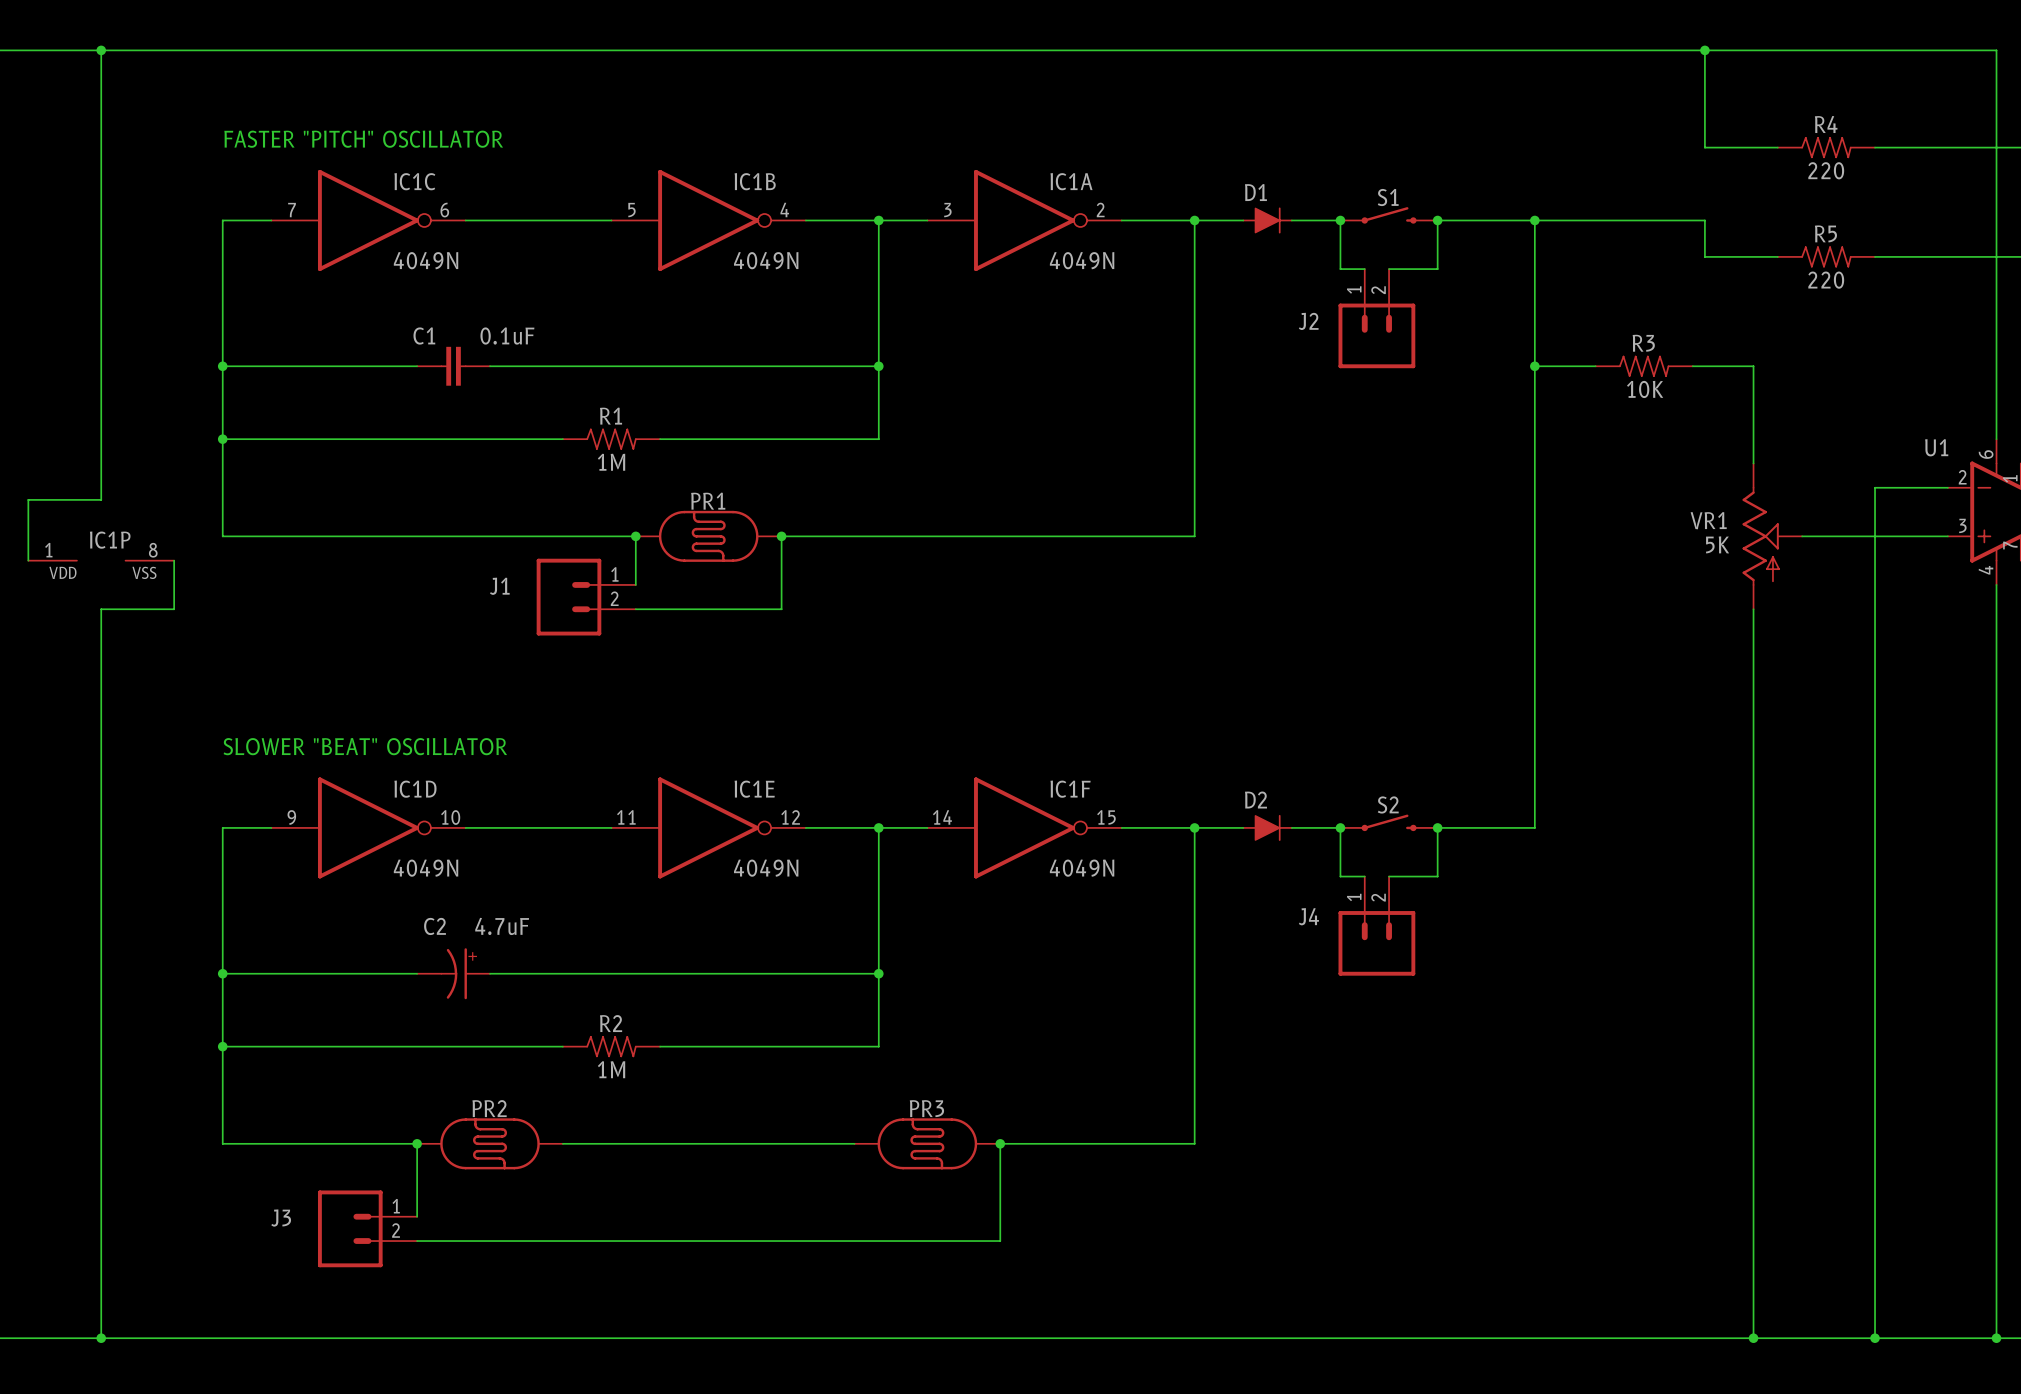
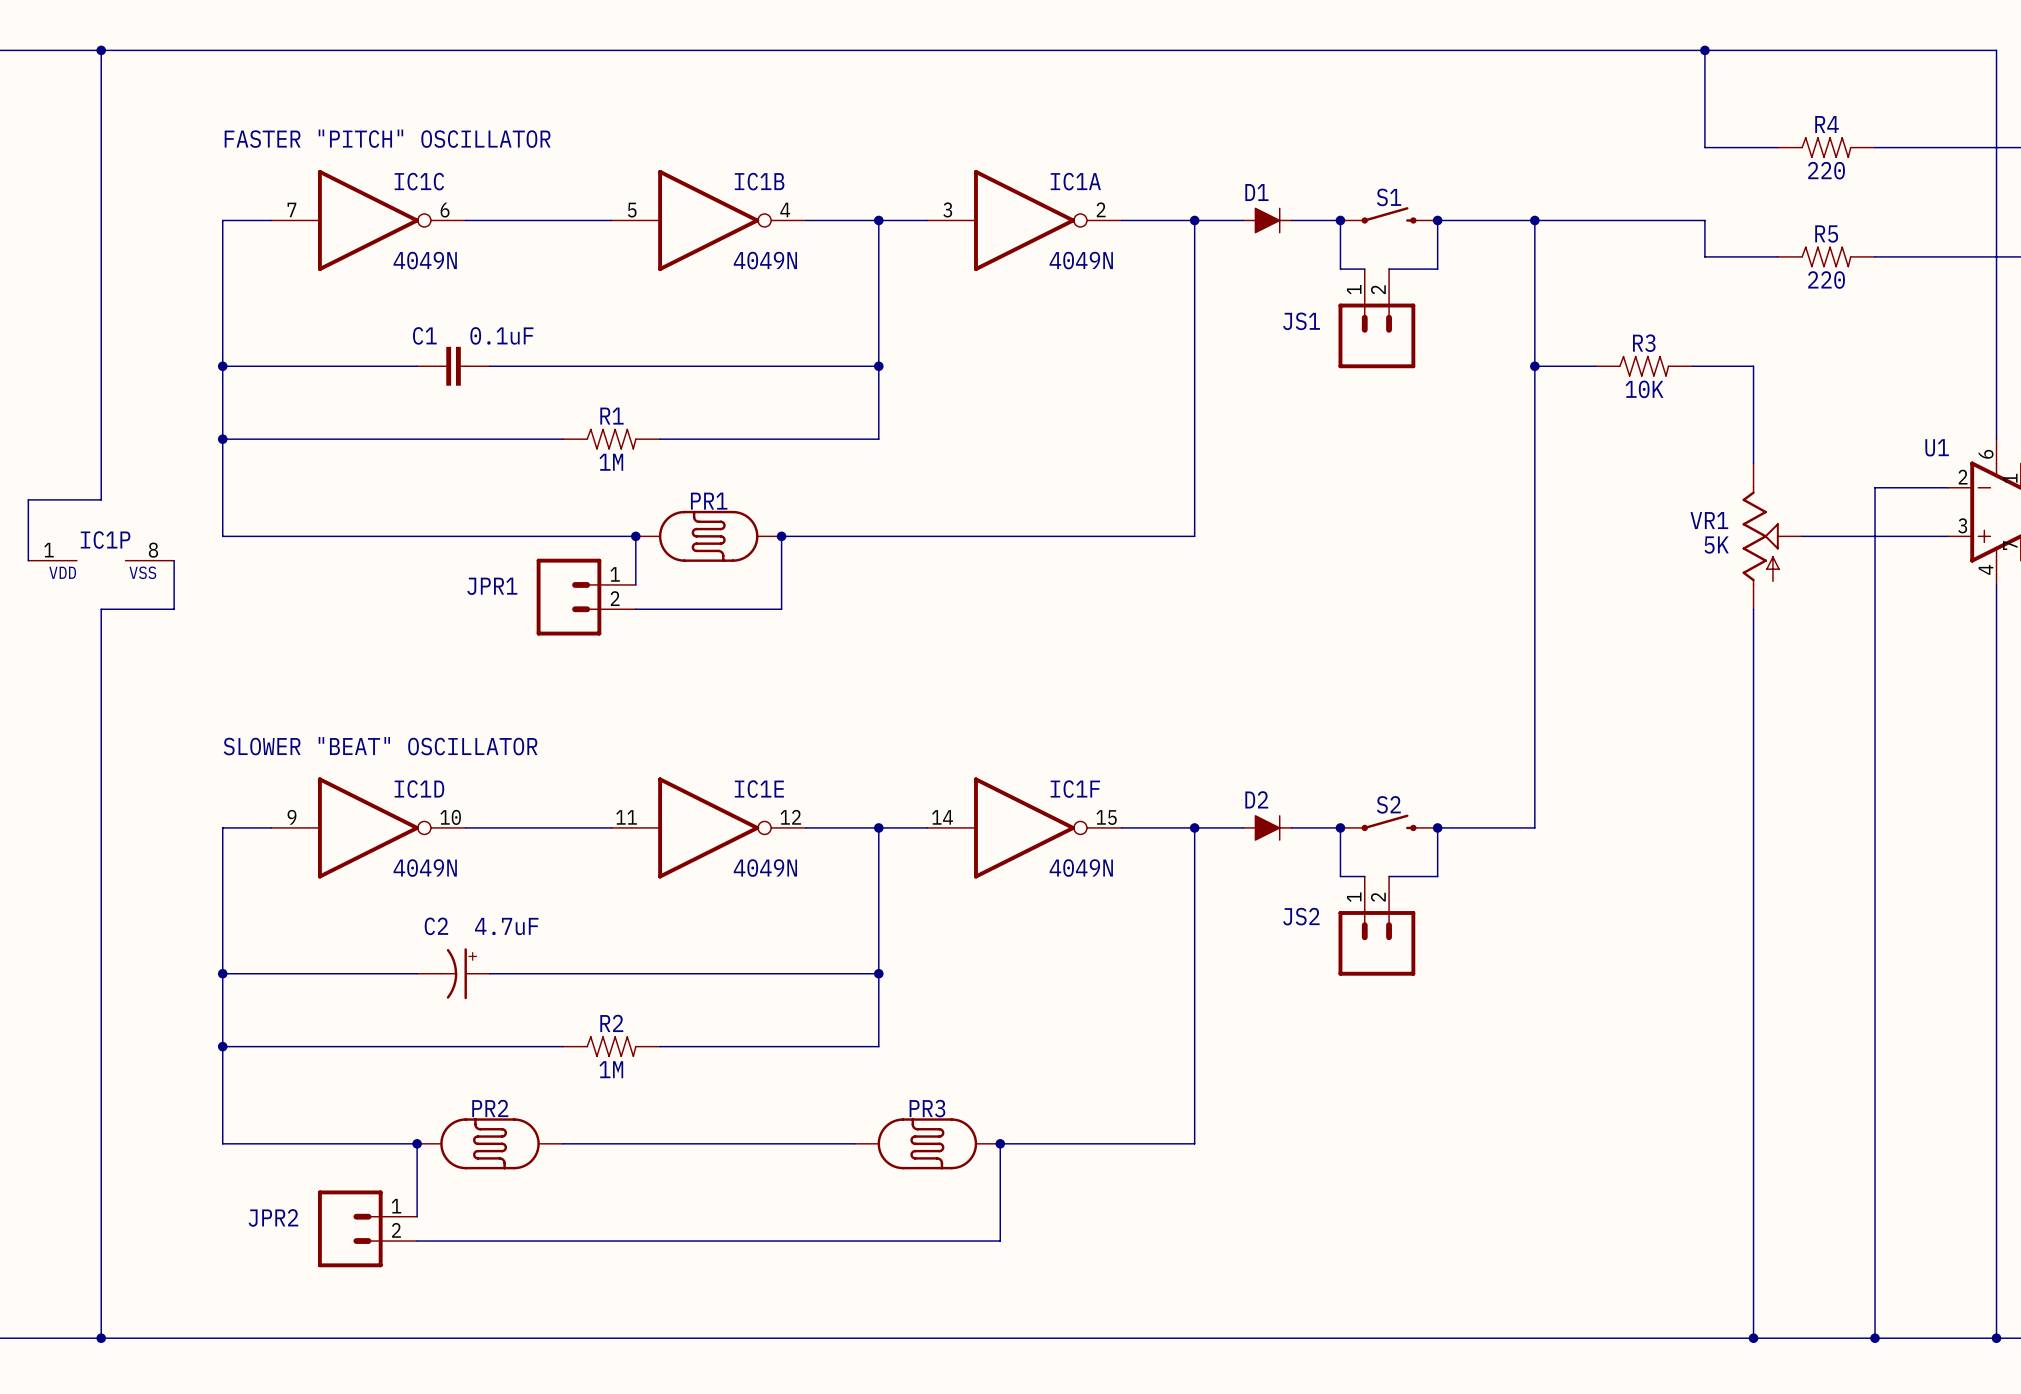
J2 name: J2 (1308, 321) -> JS1 (1301, 321)
J1 name: J1 (499, 586) -> JPR1 (492, 586)
J4 name: J4 (1308, 916) -> JS2 (1301, 916)
J3 name: J3 (281, 1218) -> JPR2 (273, 1217)

